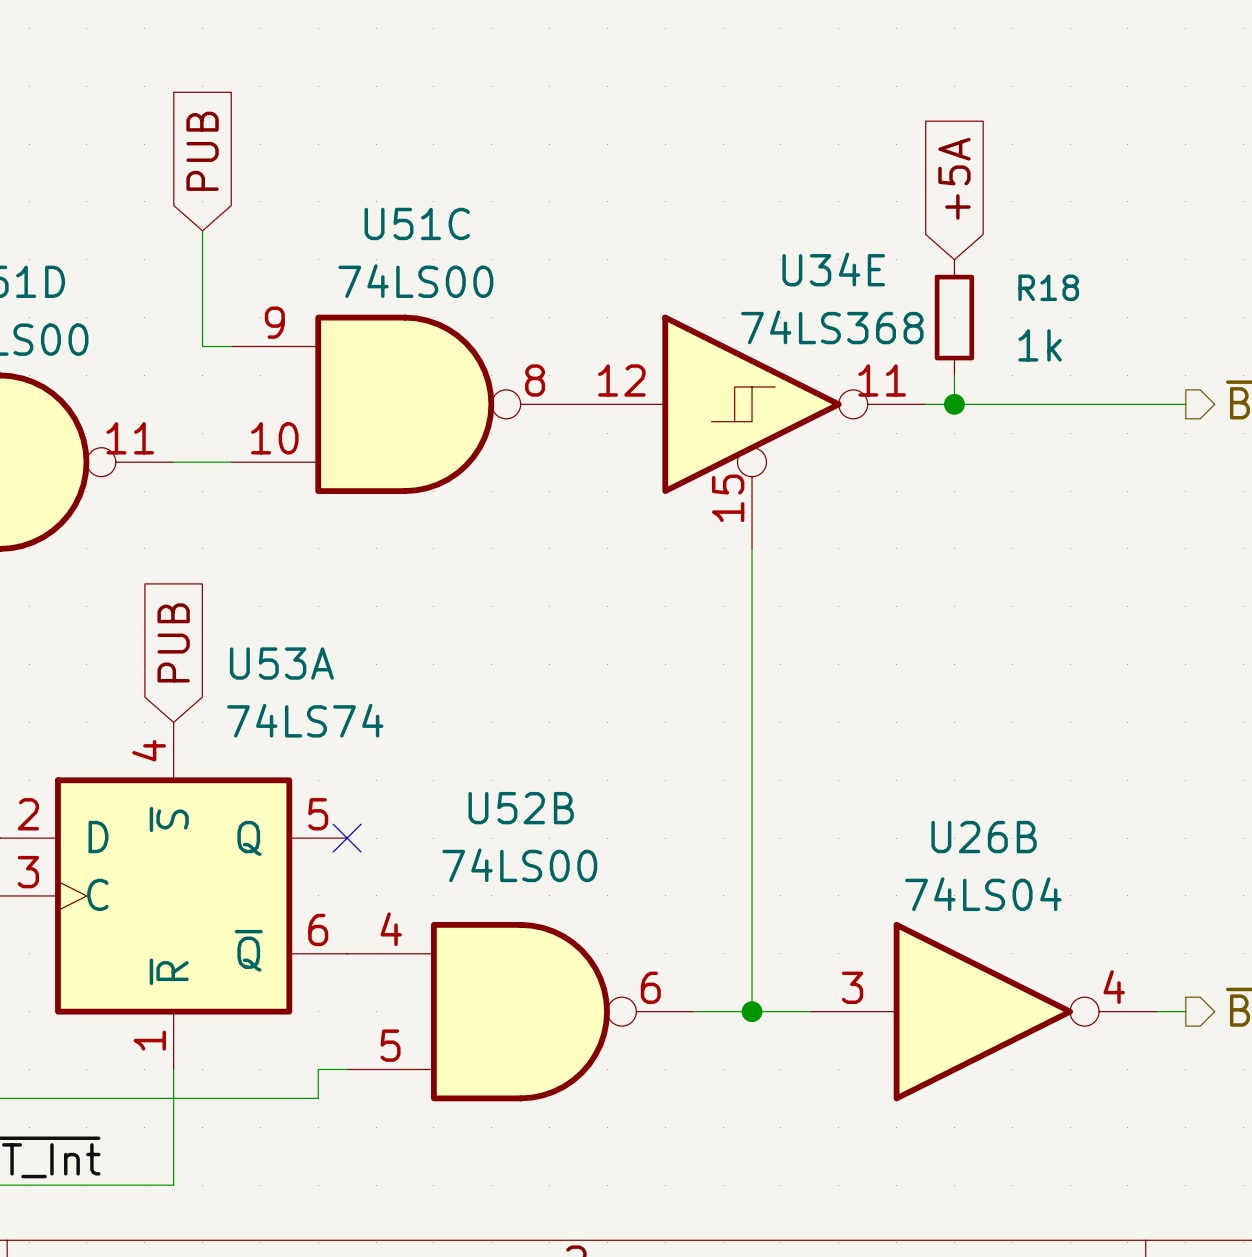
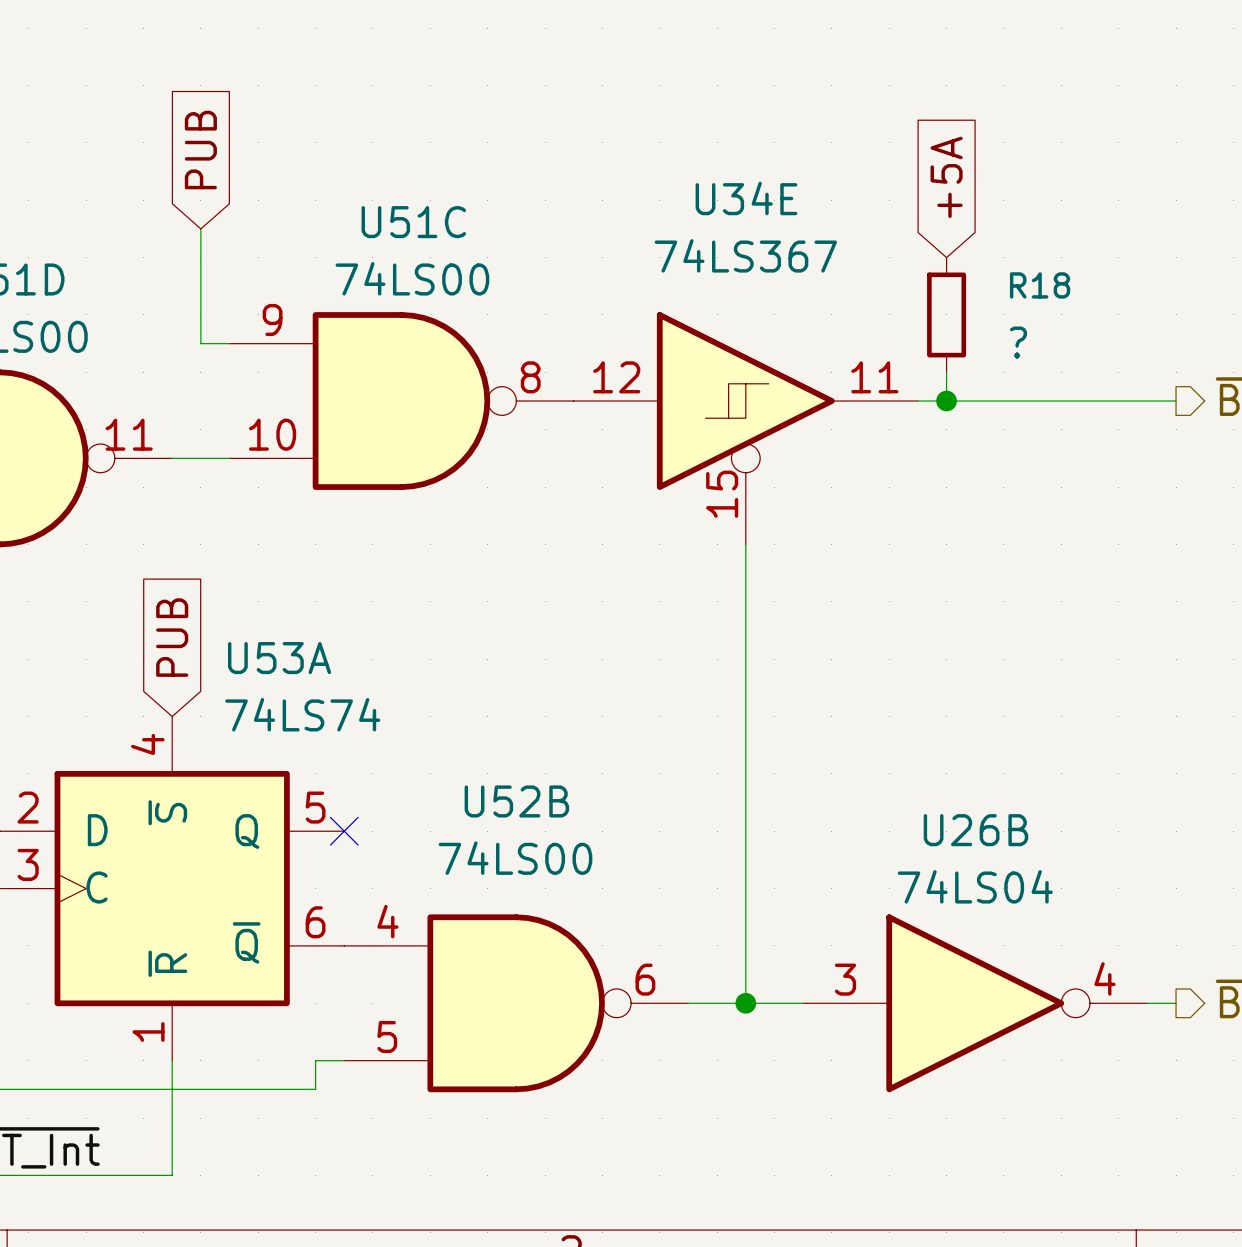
U34E name position: U34E (833, 269) -> U34E (746, 198)
U34E symbol: [578, 314, 926, 549] -> [573, 312, 918, 545]
U34E value: 74LS368 (832, 327) -> 74LS367 (745, 255)
R18 value: 1k (1040, 345) -> ? (1018, 342)

